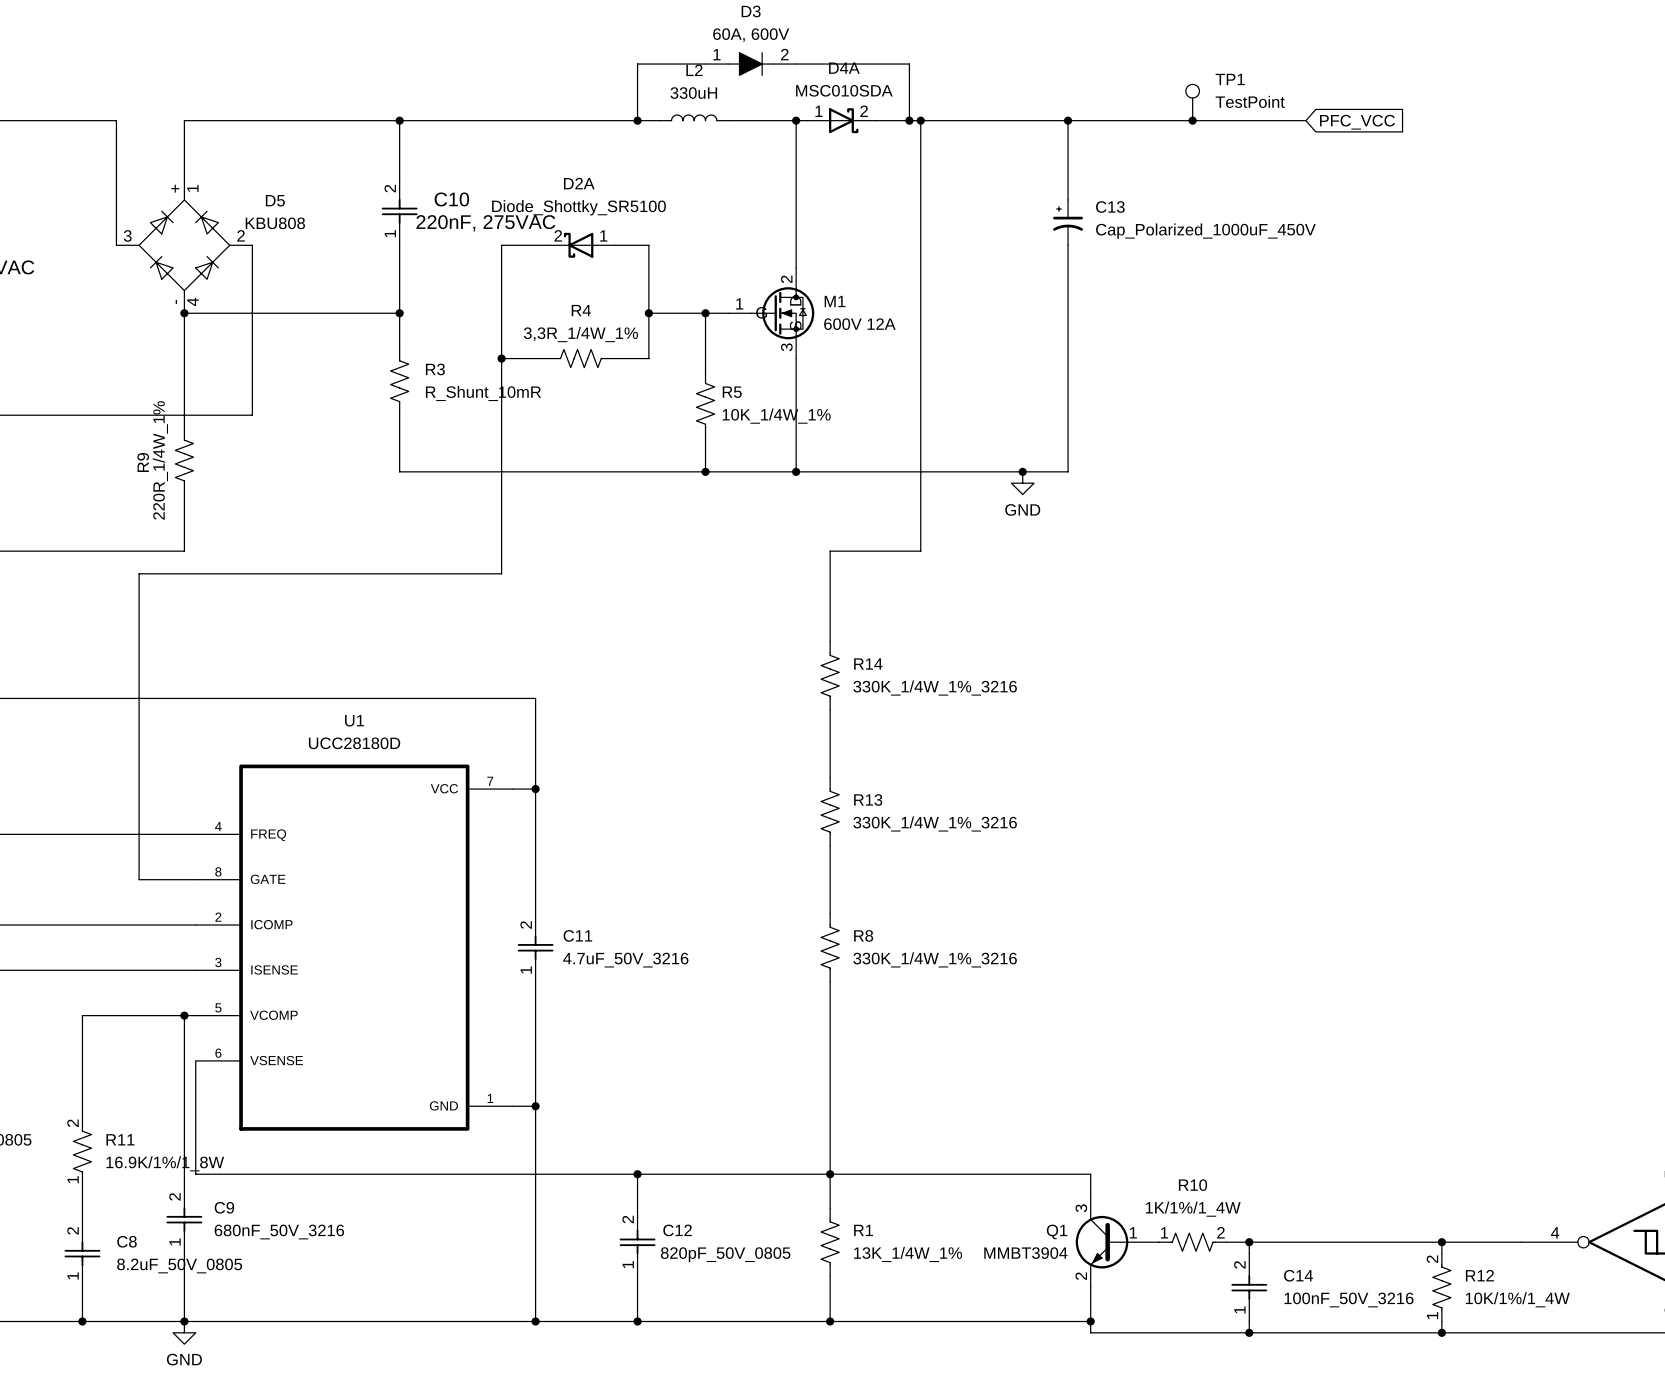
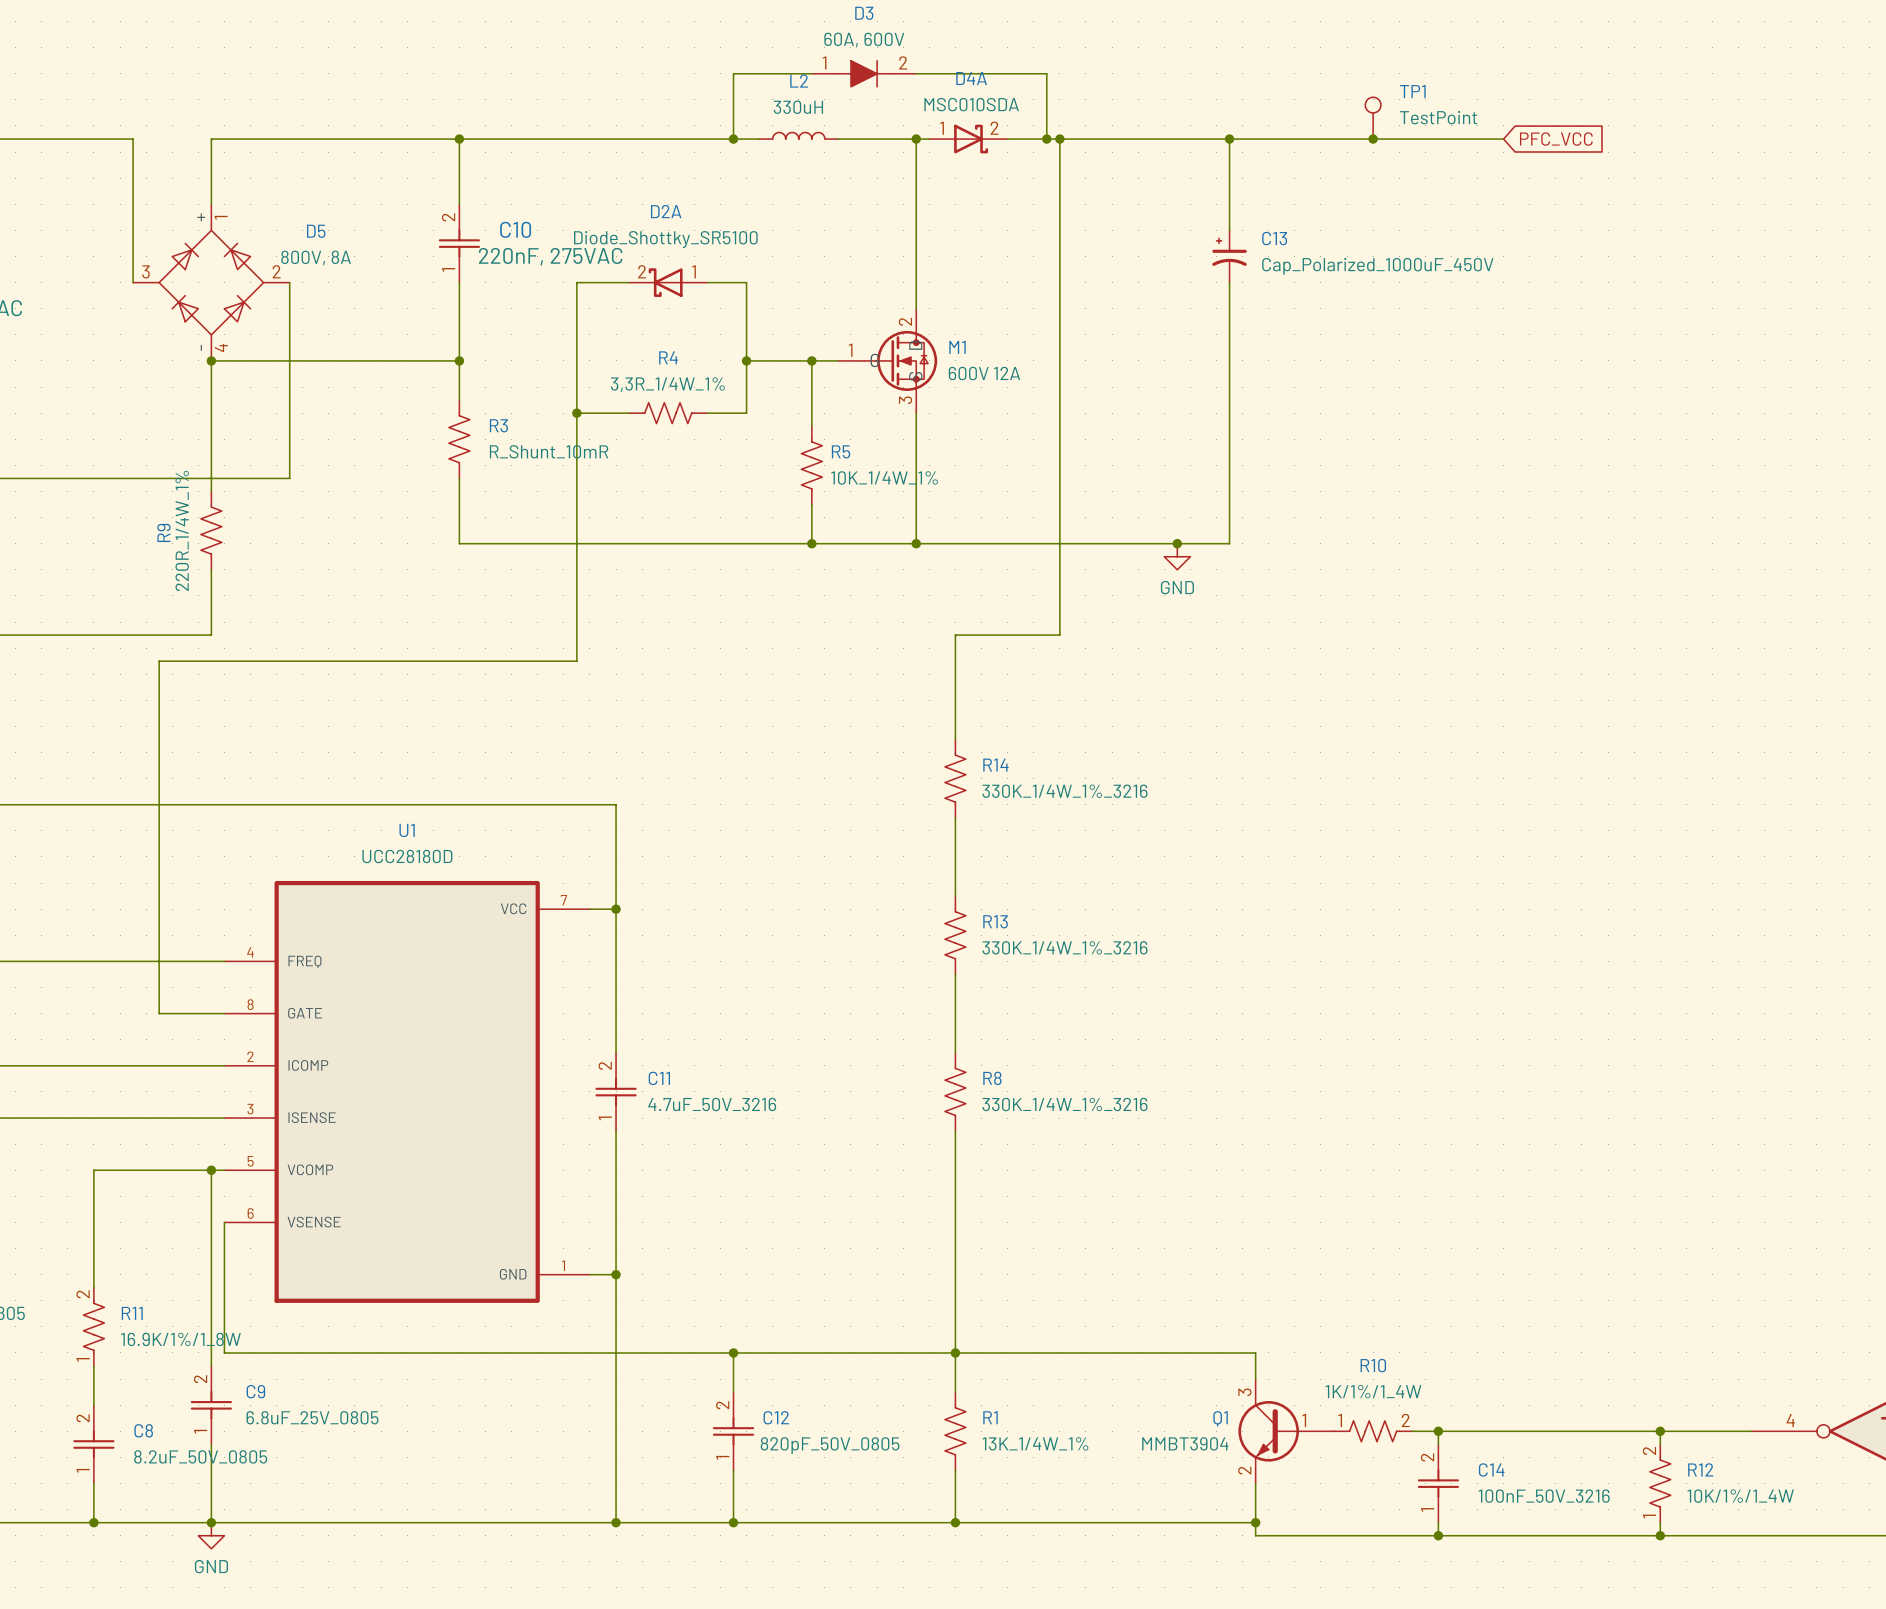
D5 value: KBU808 (275, 223) -> 800V, 8A (316, 257)
C9 value: 680nF_50V_3216 (279, 1232) -> 6.8uF_25V_0805 (312, 1417)

